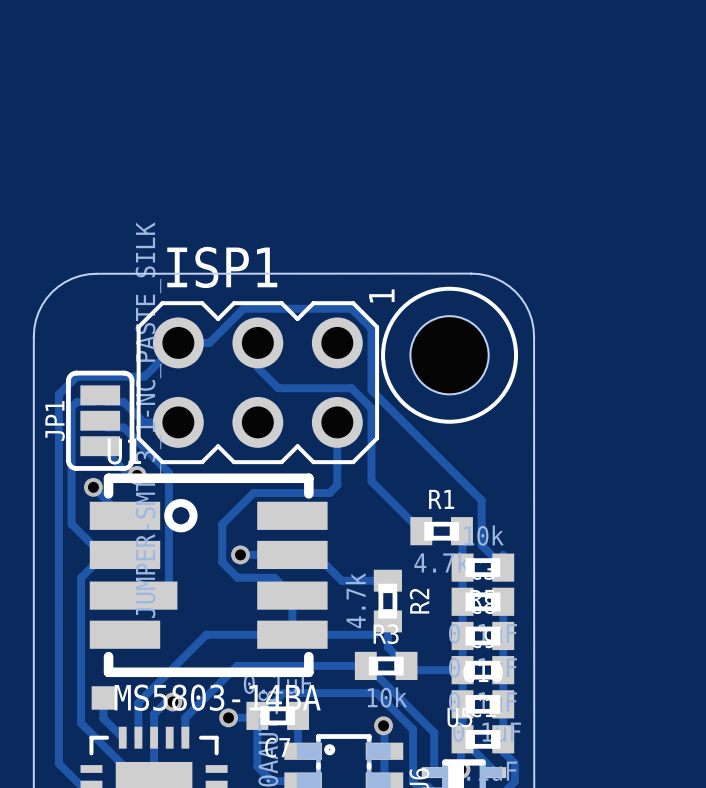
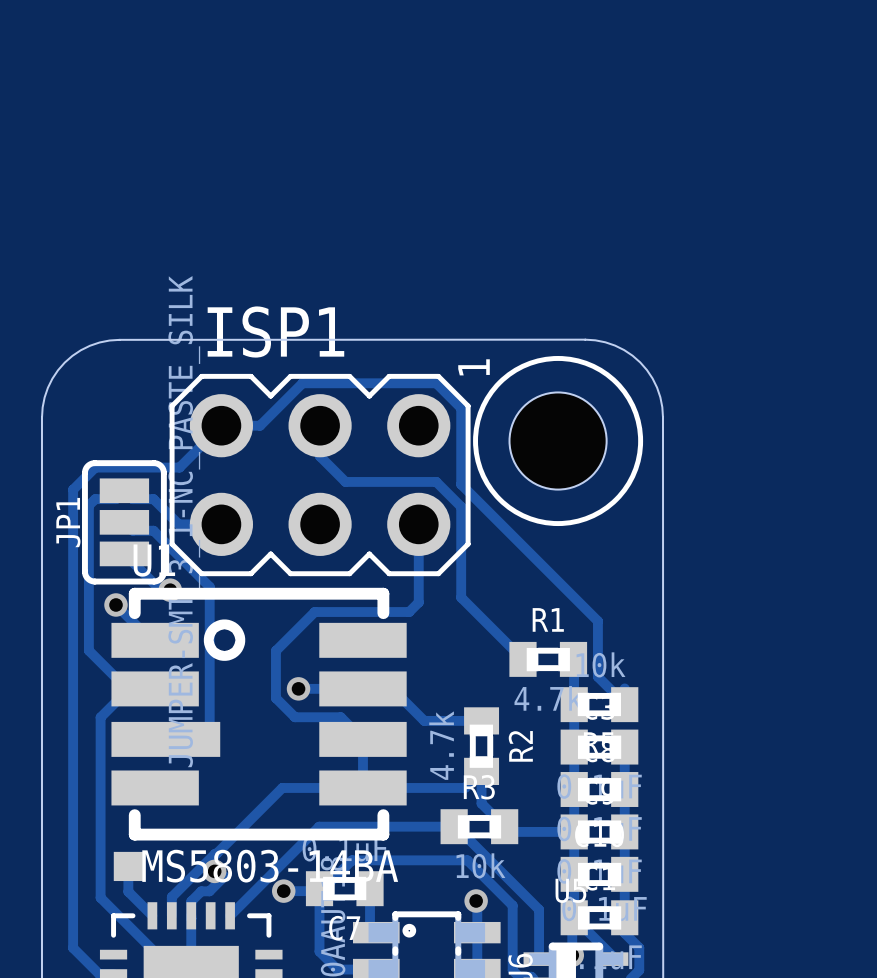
track: (227, 634) (206, 634) (138, 702) (138, 722) -> (282, 787) (171, 897)
track: (257, 665) (237, 665) (185, 717) (185, 737) -> (319, 826) (230, 915)
track: (172, 701) (166, 701) (154, 714) (154, 726) -> (224, 876) (209, 891) (201, 891) (191, 901)

